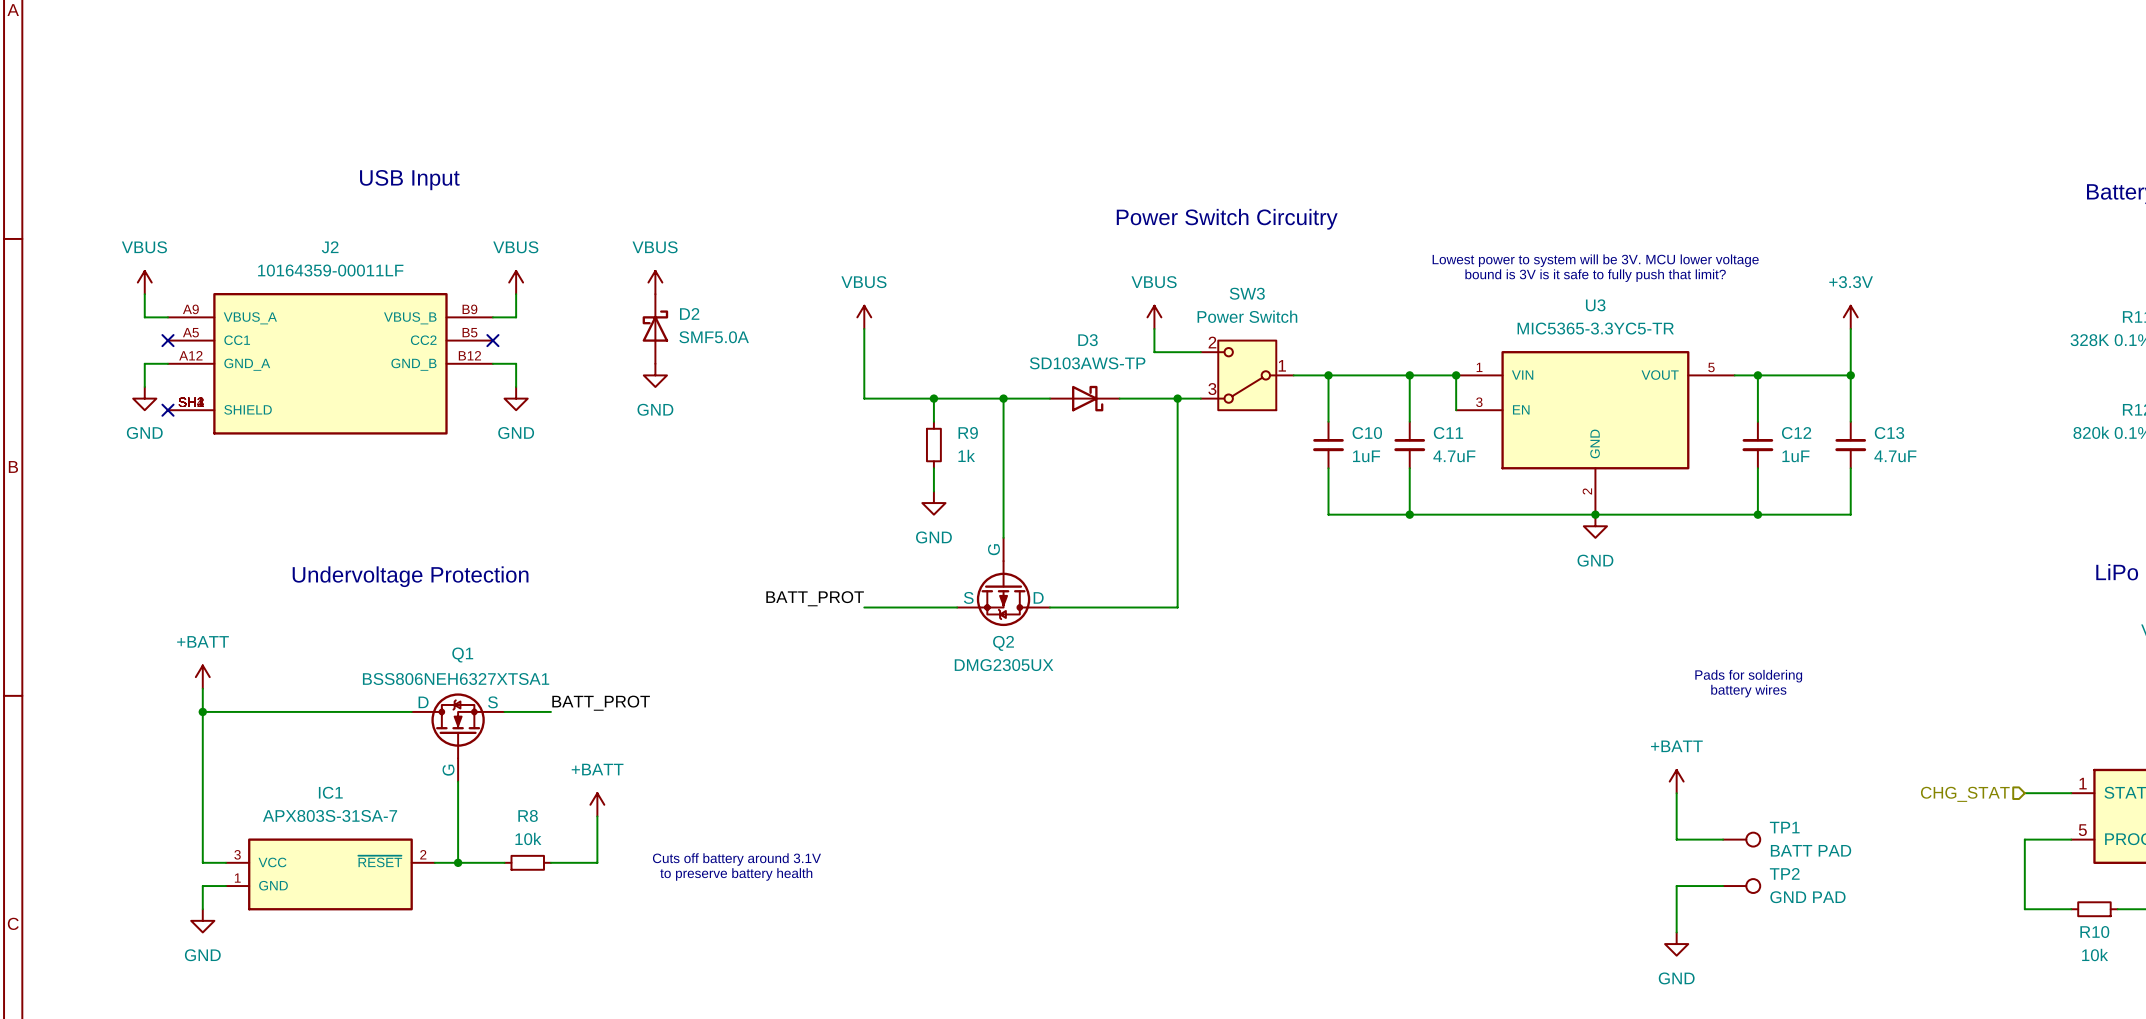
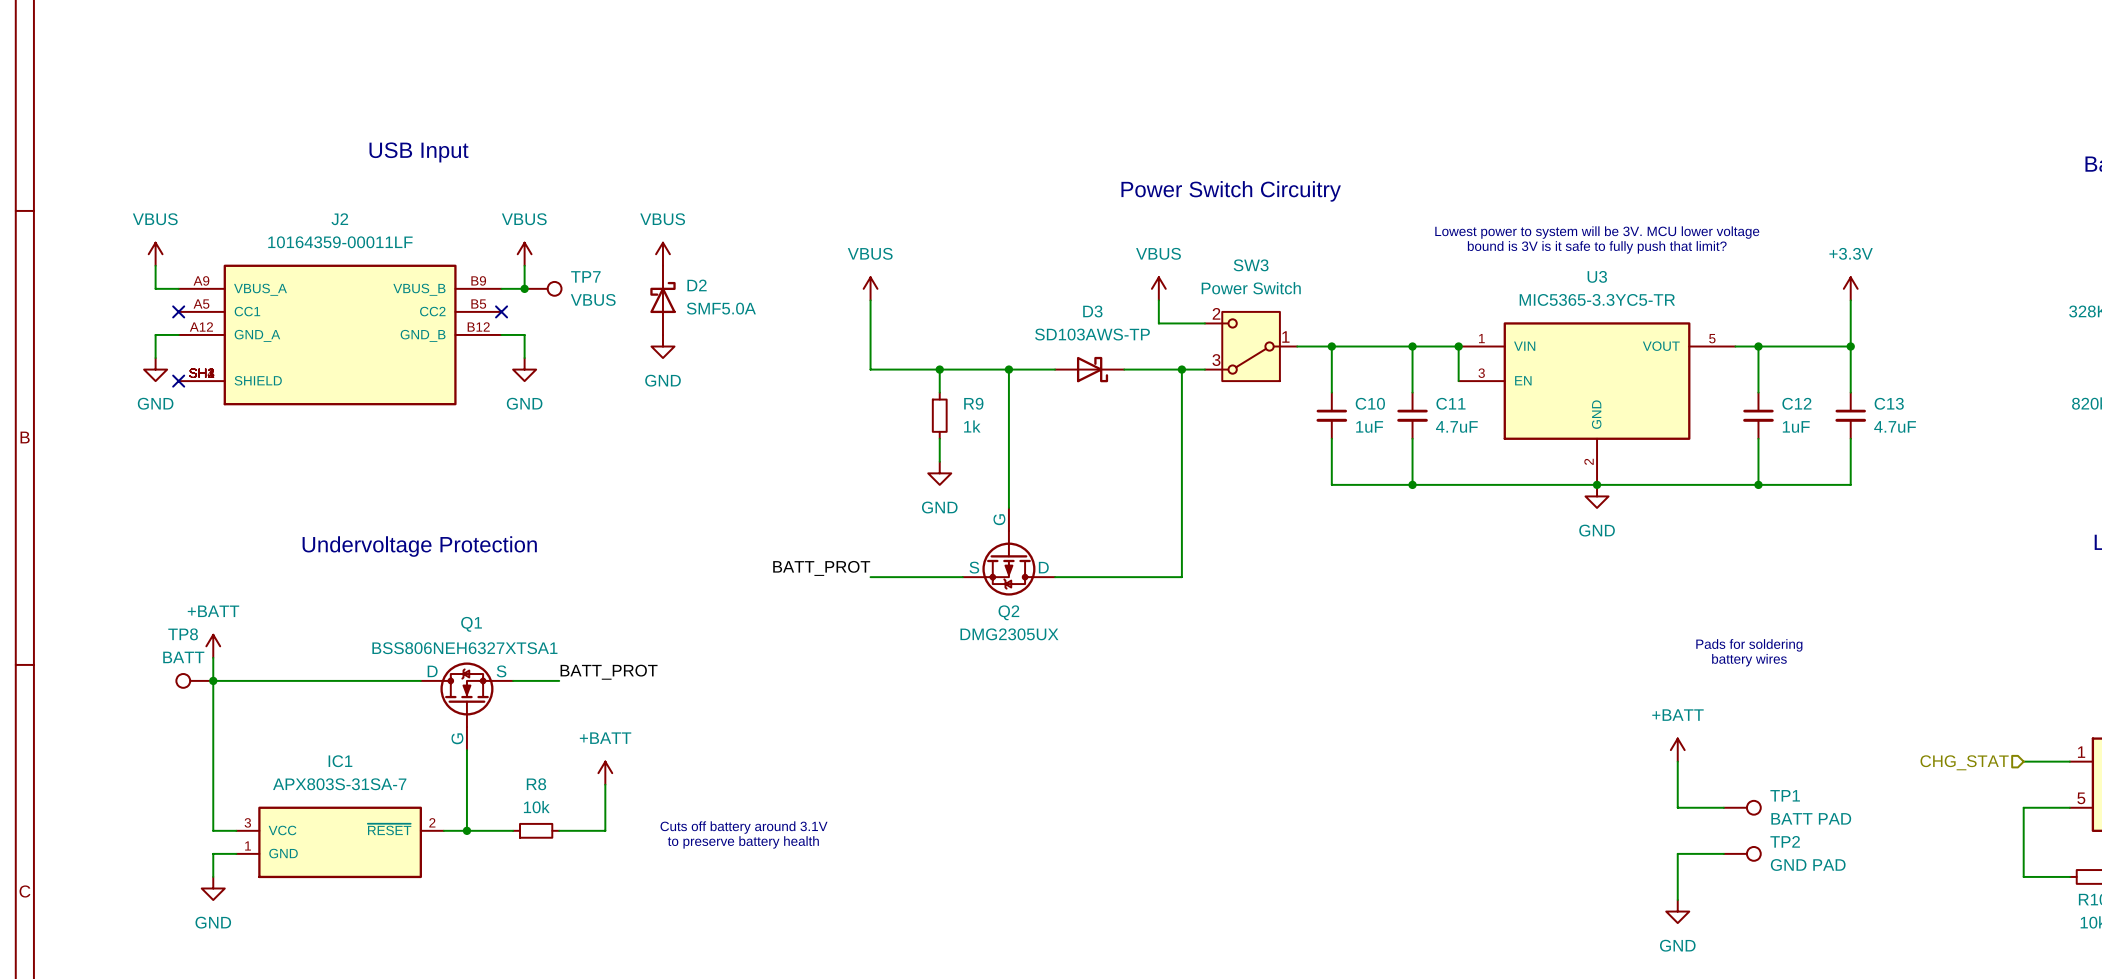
junction: none -> (524, 288)
TP7: none -> VBUS (543, 288)
TP8: none -> BATT (194, 680)

